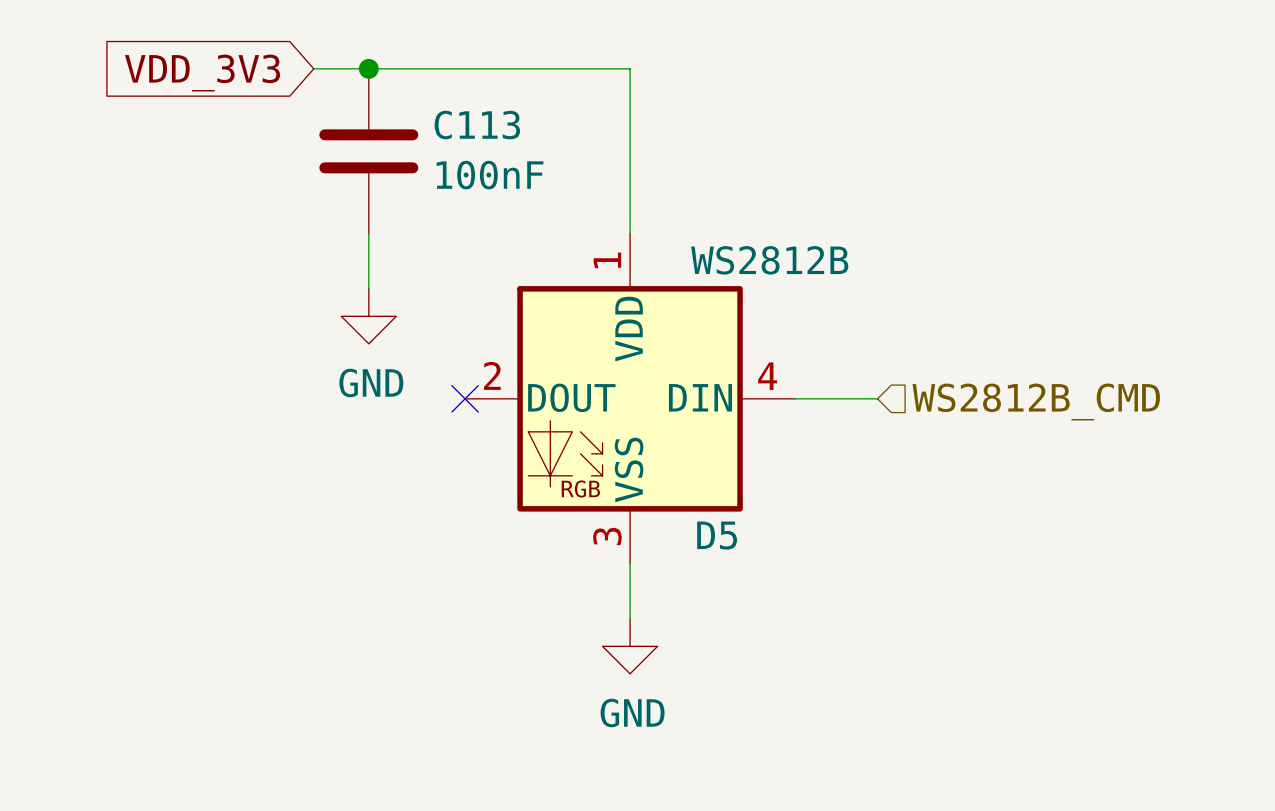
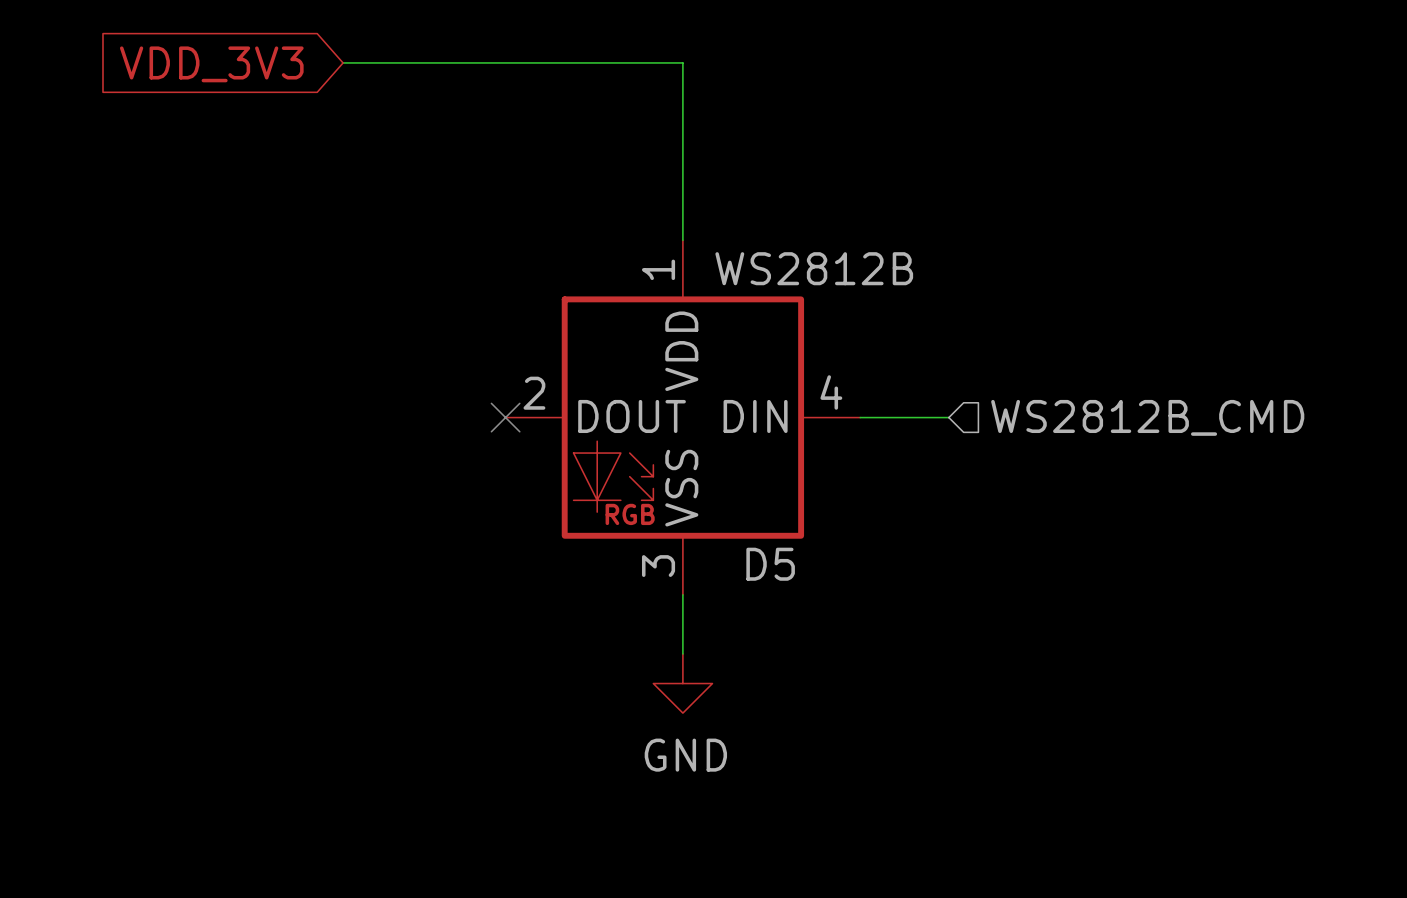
junction: (368, 68) -> none
C113: 100nF (368, 151) -> none
wire: (368, 233) (368, 288) -> none
power symbol: GND (368, 316) -> none

